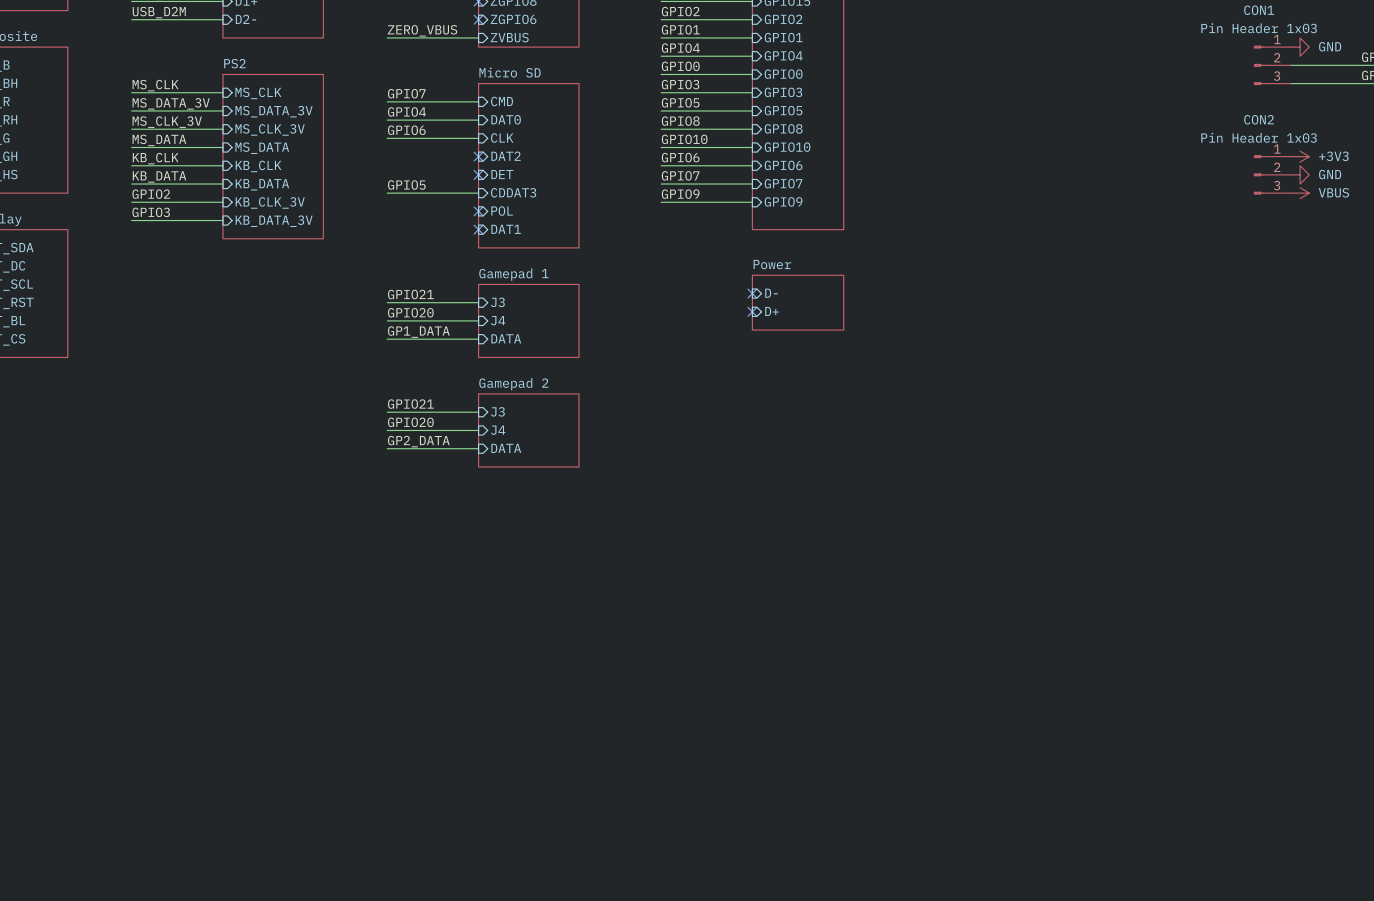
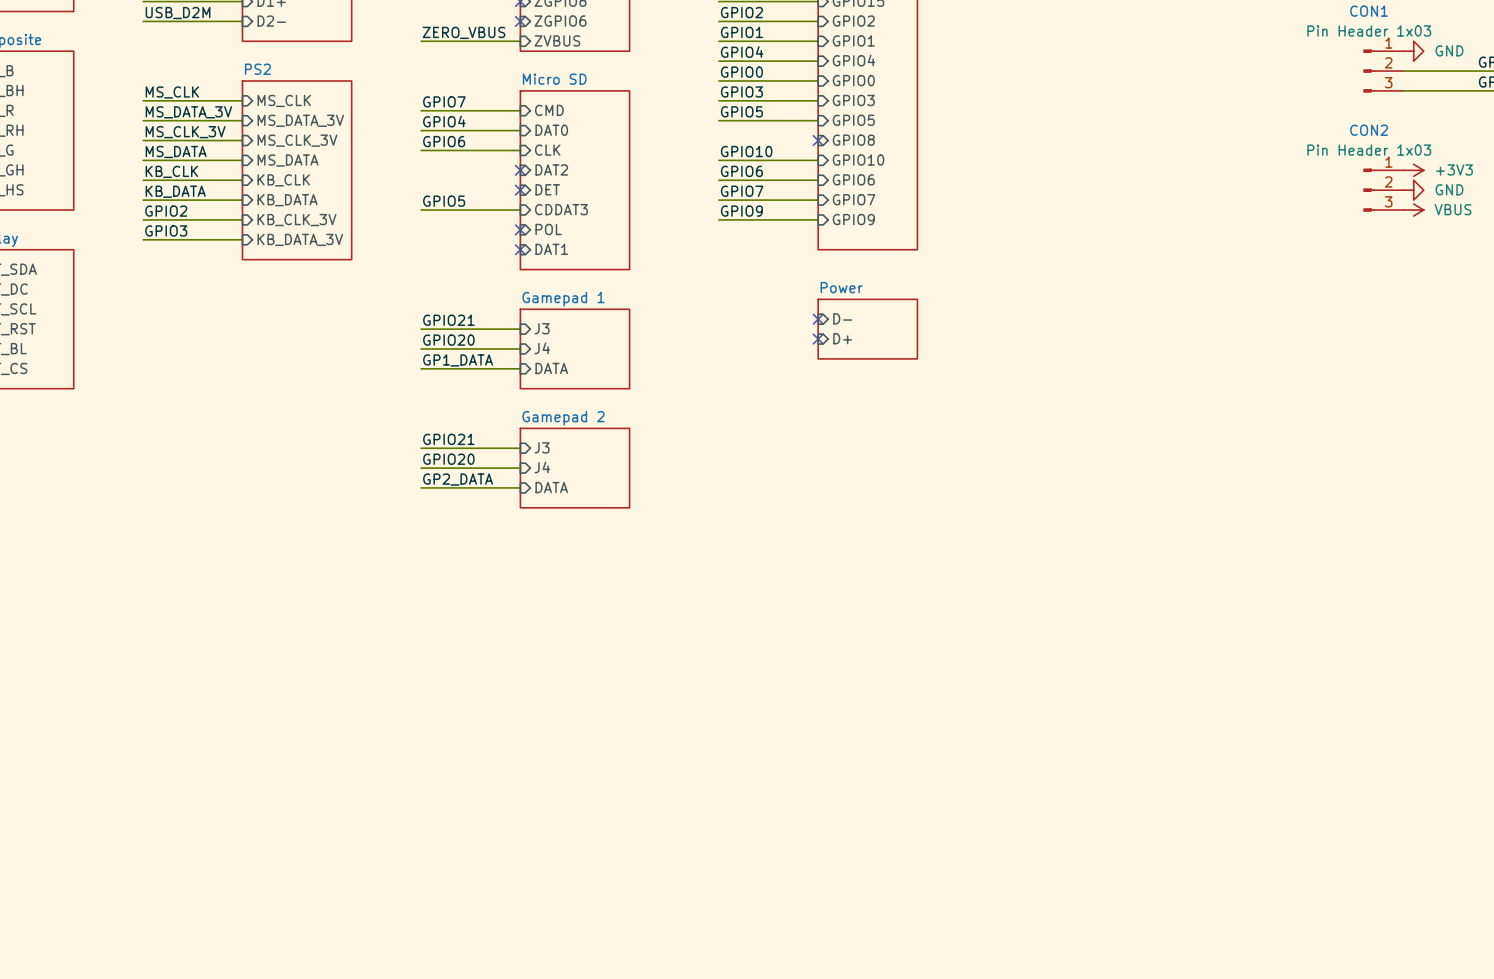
label: GPIO8 (680, 121) -> none
wire: (661, 129) (752, 129) -> none
no-connect mark: none -> (818, 140)

